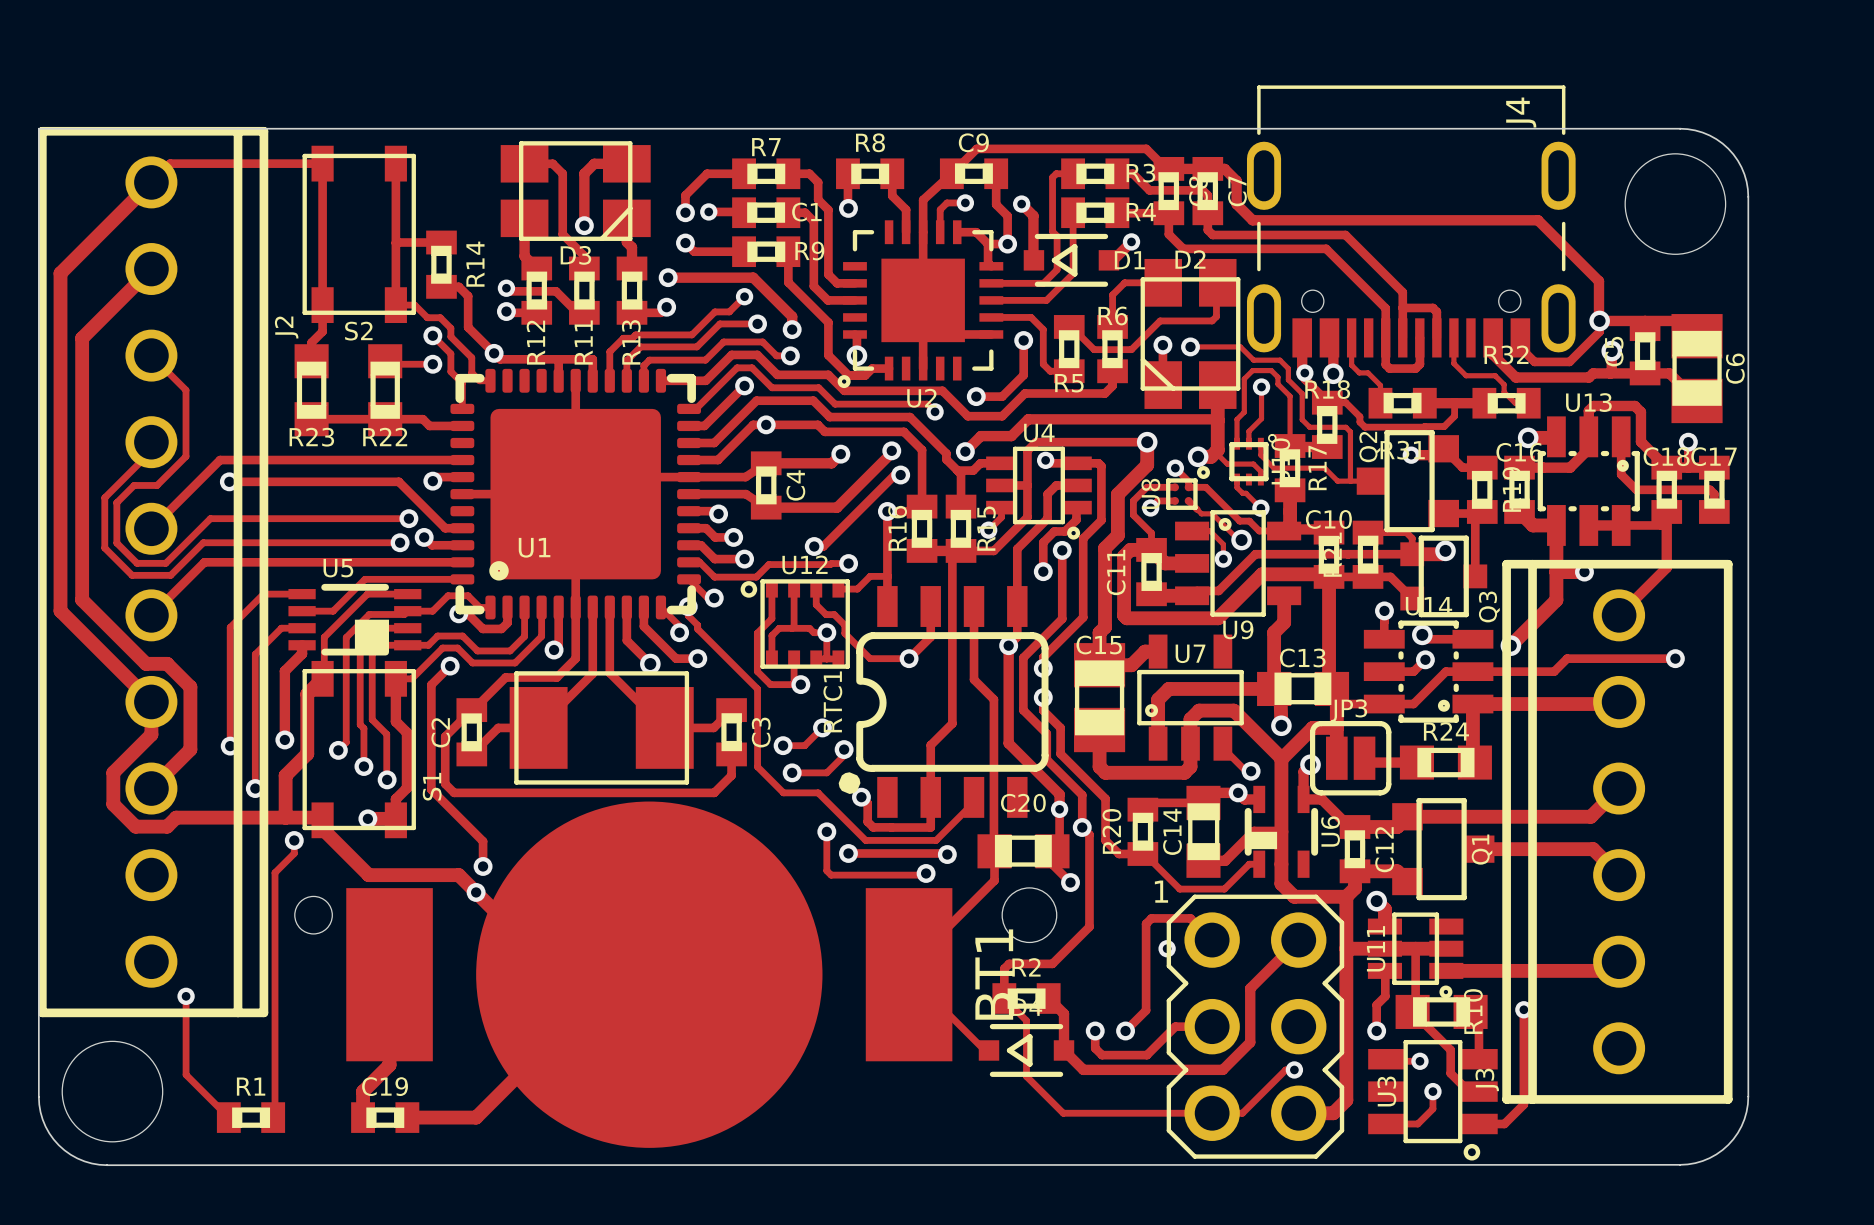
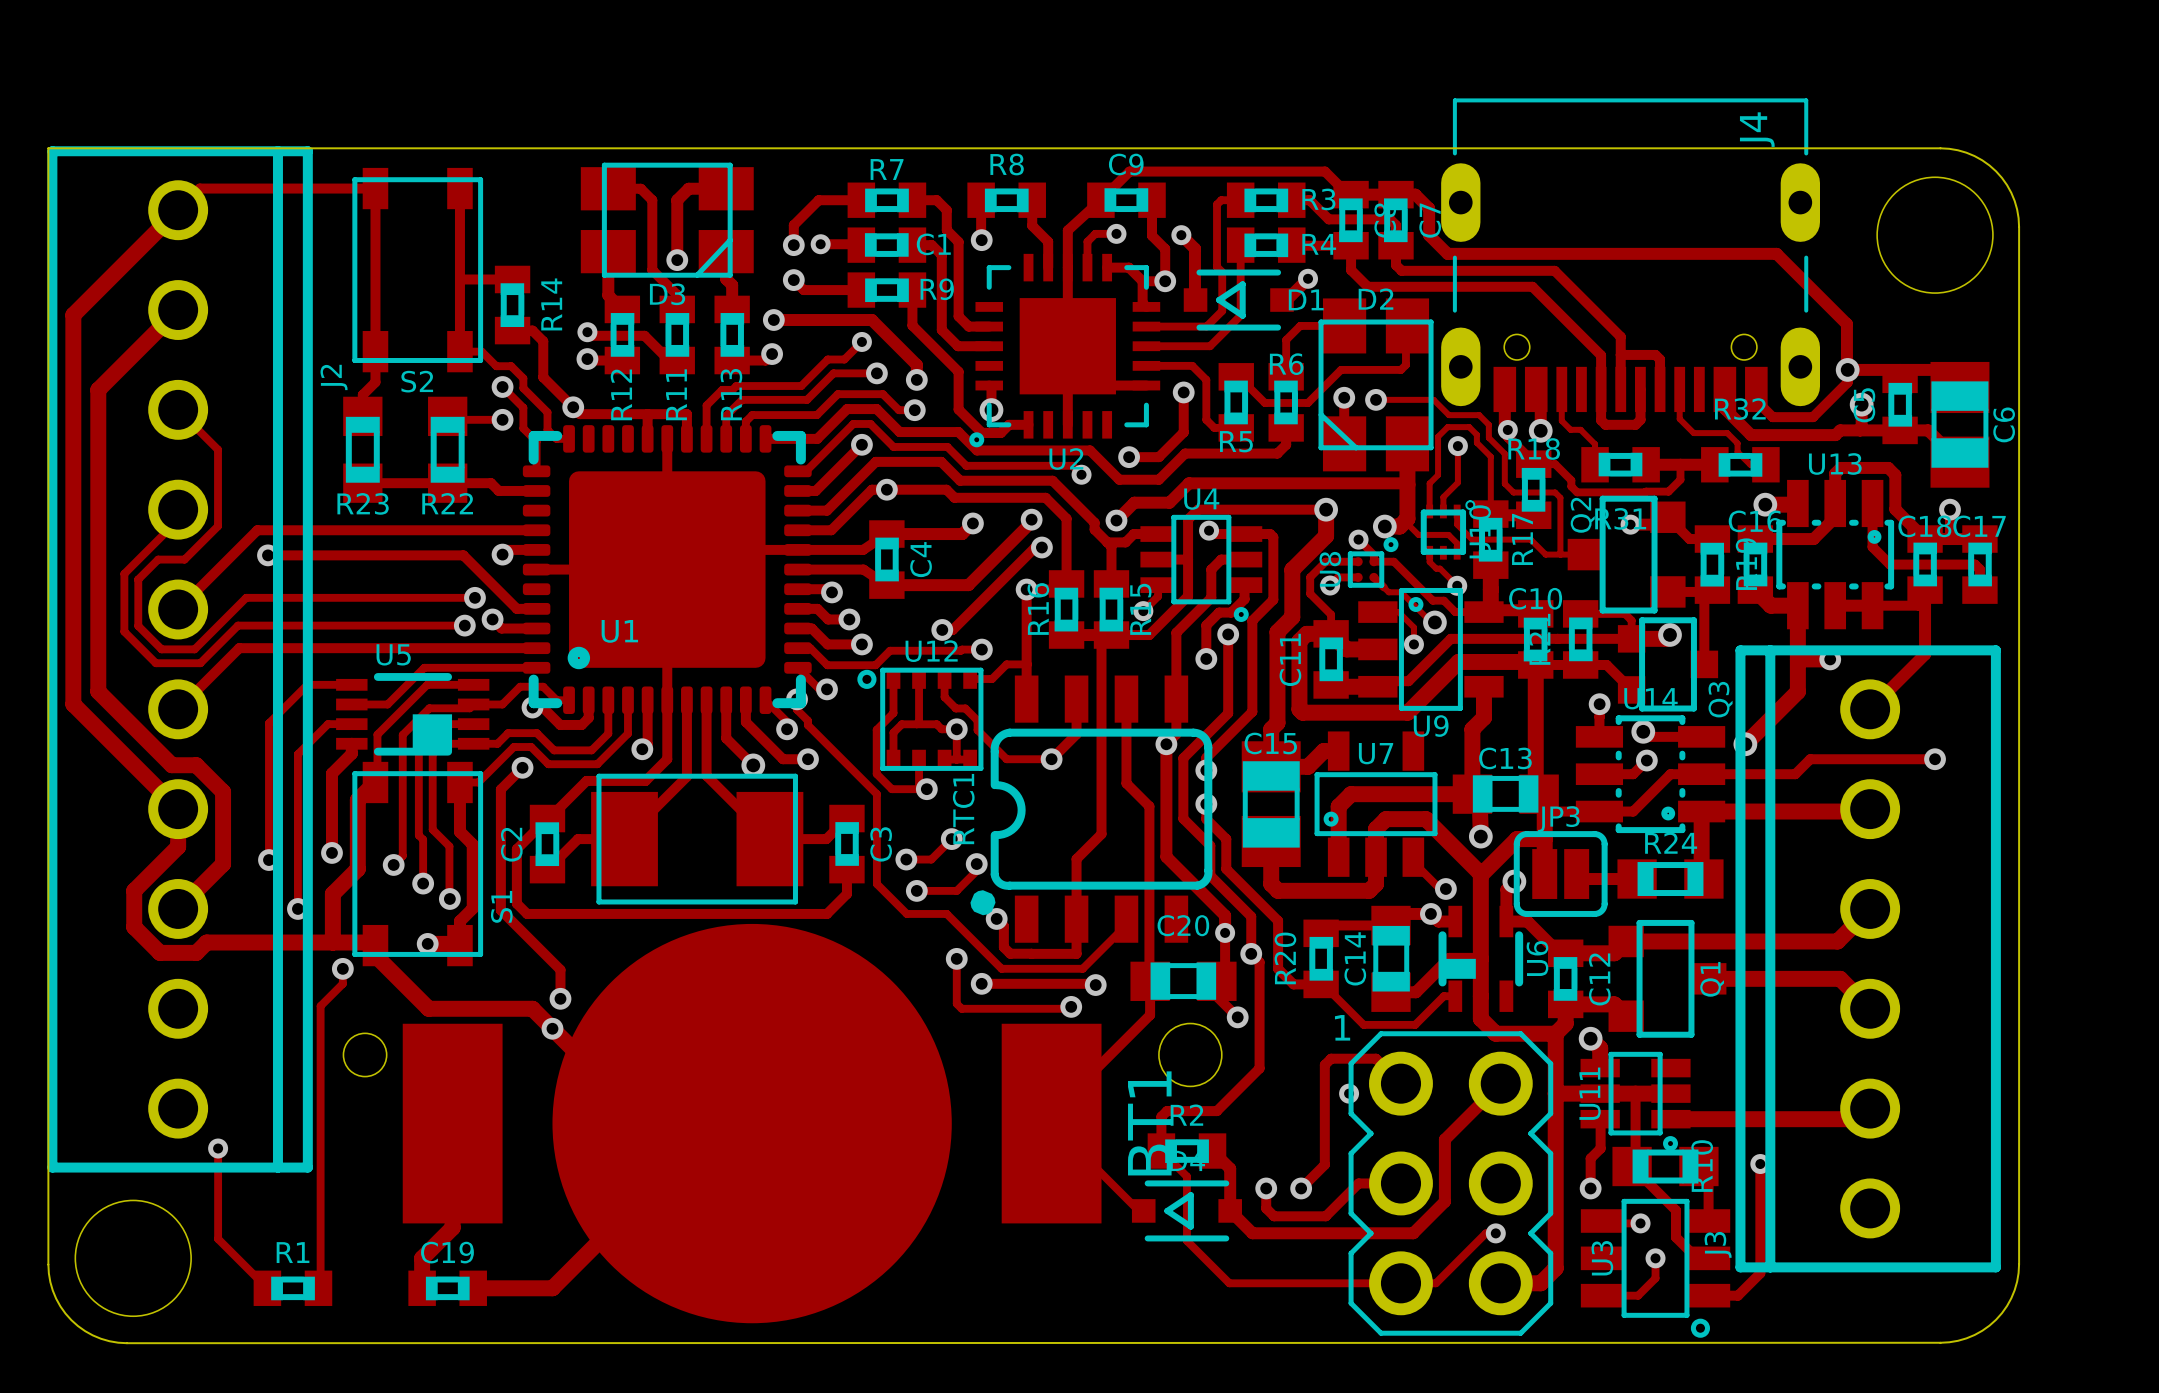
J4 footprint: [1246, 85, 1576, 358] -> [1441, 98, 1821, 413]

